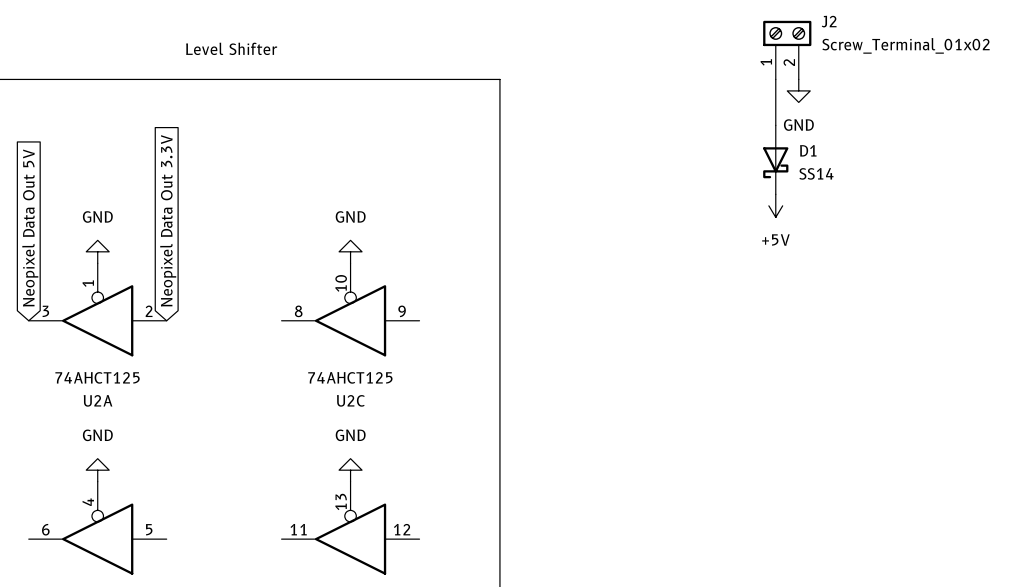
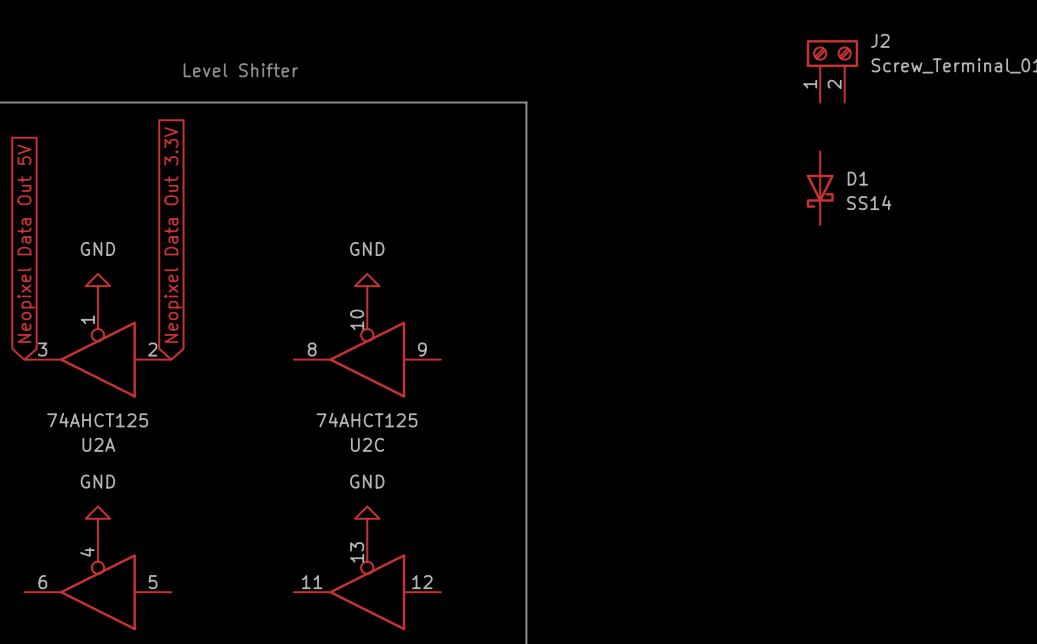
wire: (775, 79) (775, 125) -> none
power symbol: GND (798, 90) -> none
power symbol: +5V (775, 205) -> none

